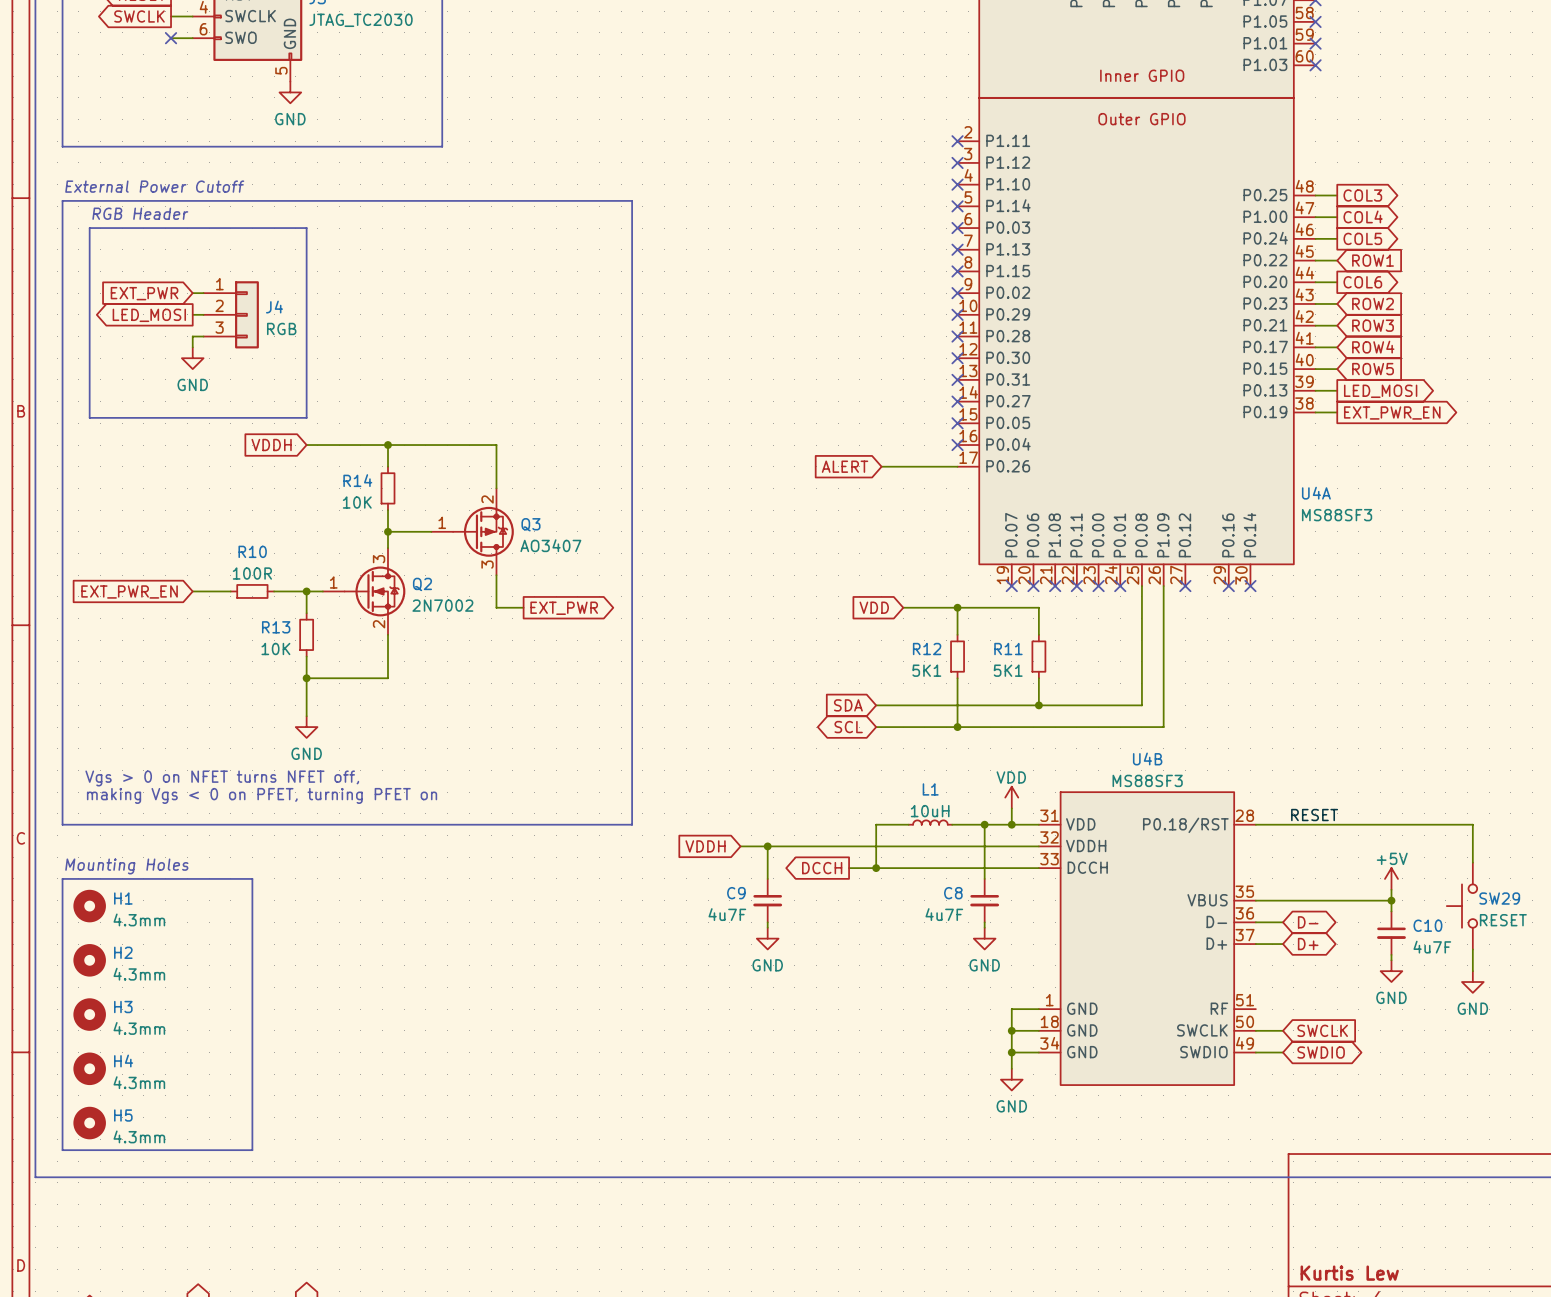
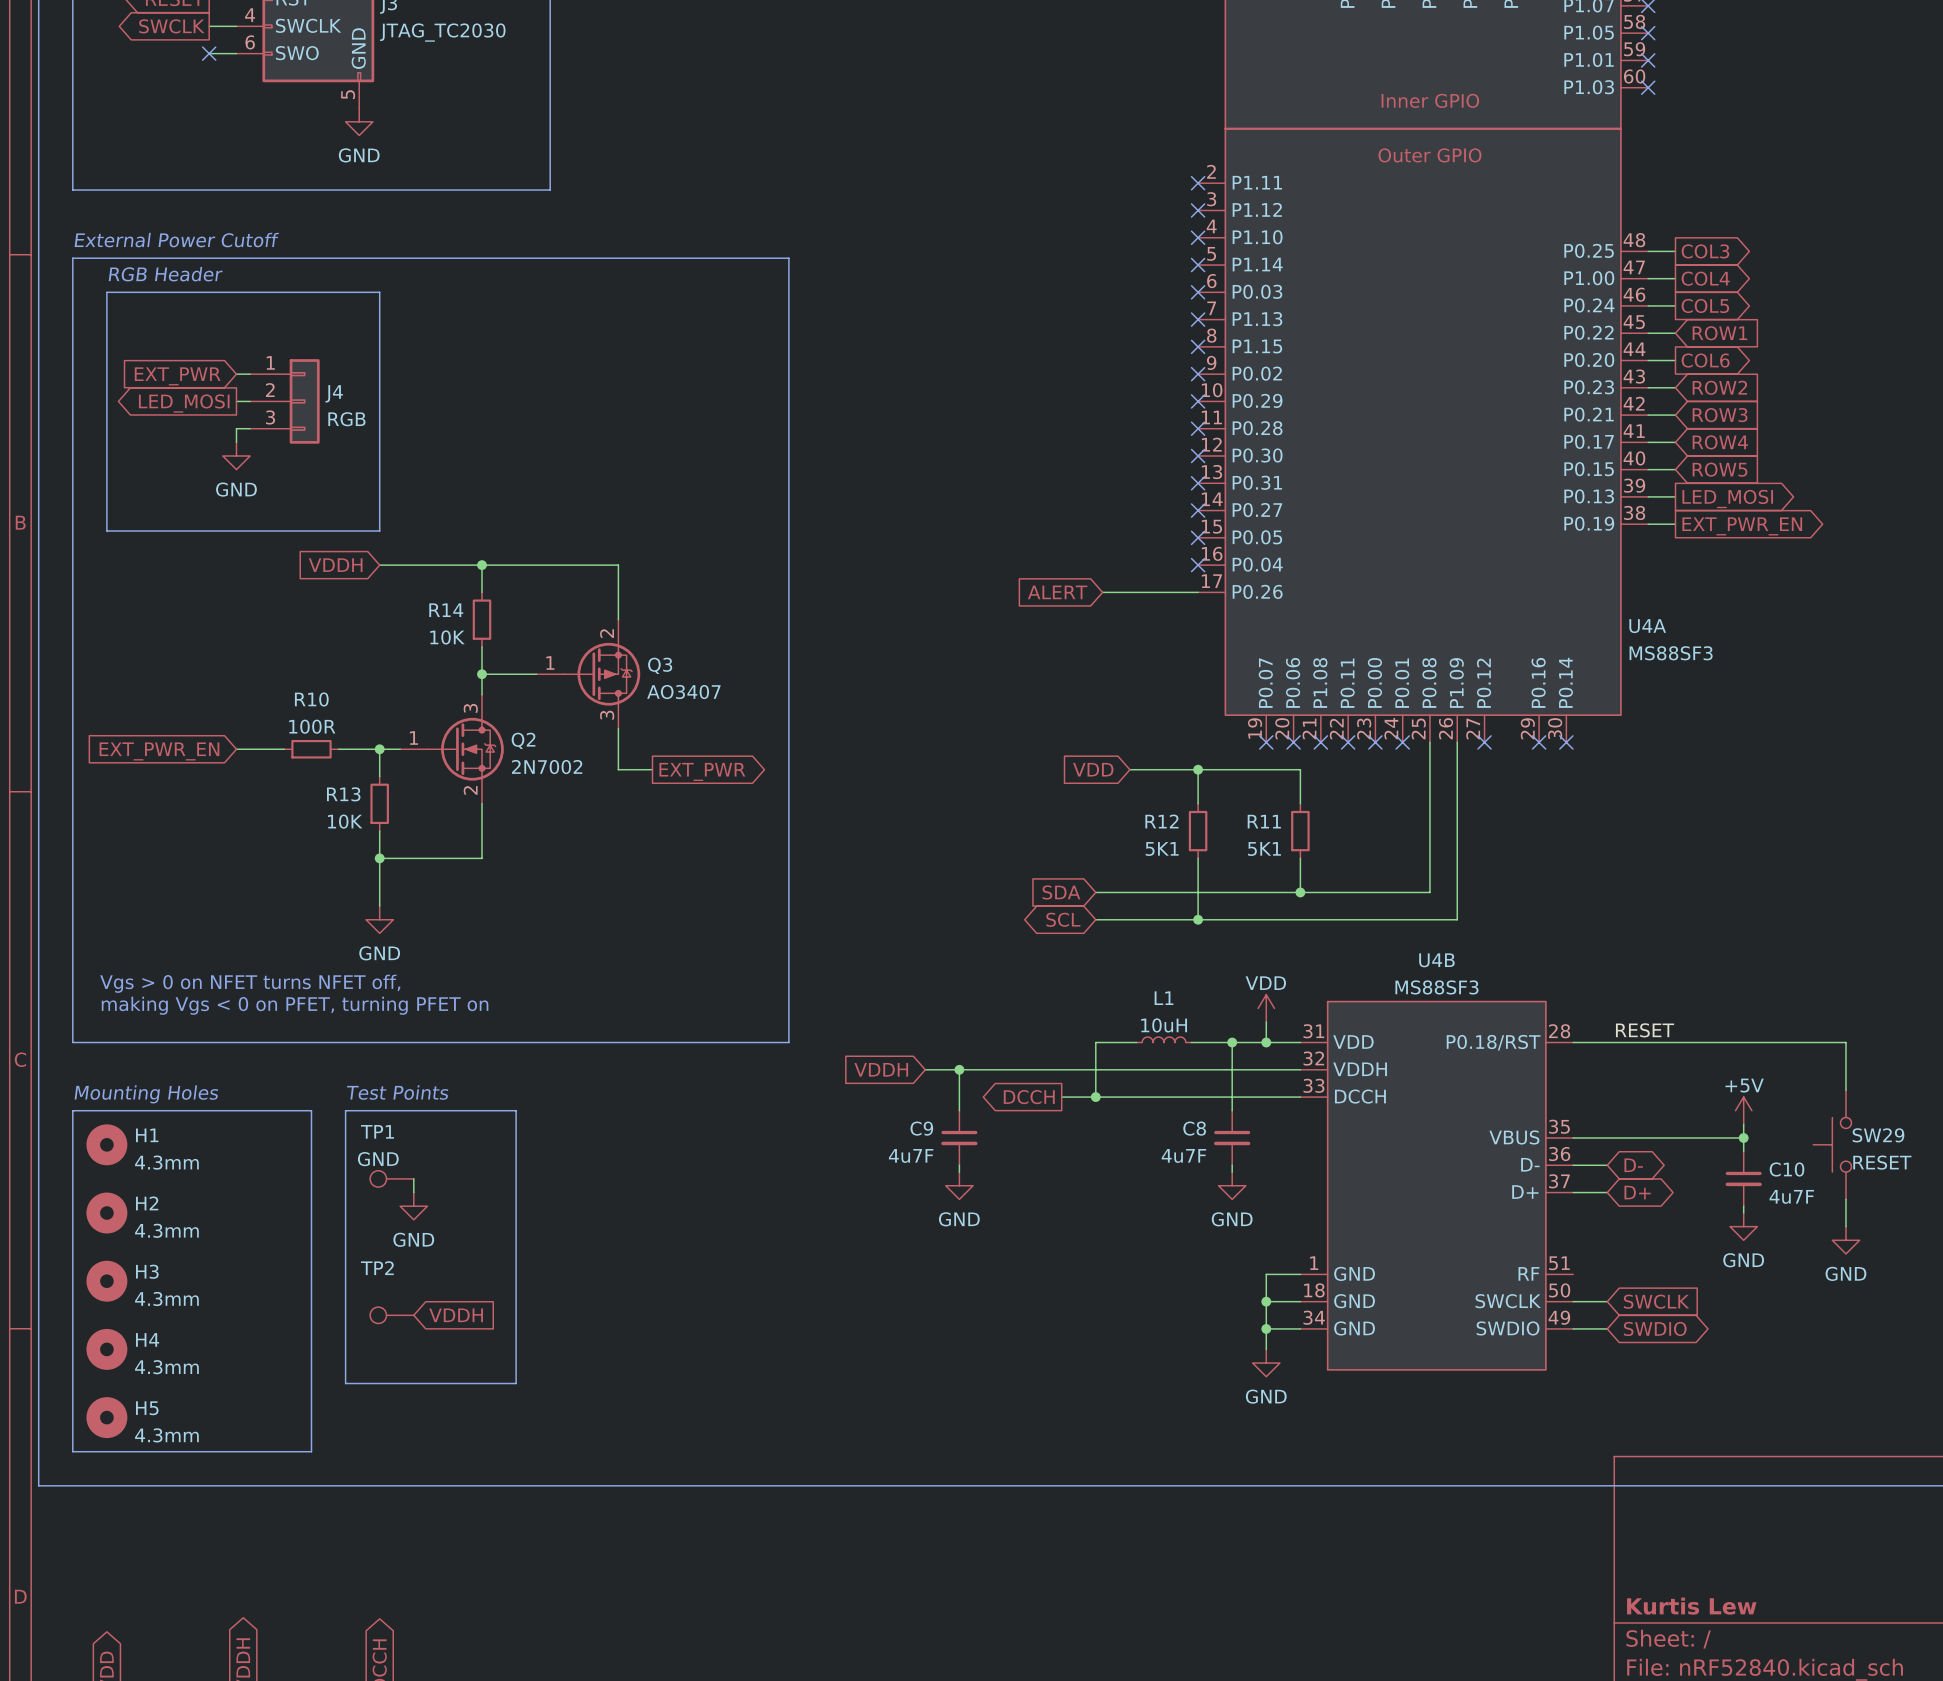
text: none -> Test Points (397, 1092)
line: none -> (345, 1110) (345, 1383) (516, 1383) (516, 1110) (345, 1110)
TP1: none -> GND (391, 1178)
wire: none -> (413, 1178) (413, 1192)
power symbol: none -> GND (413, 1206)
TP2: none -> (391, 1315)
global label: none -> VDDH (456, 1315)

